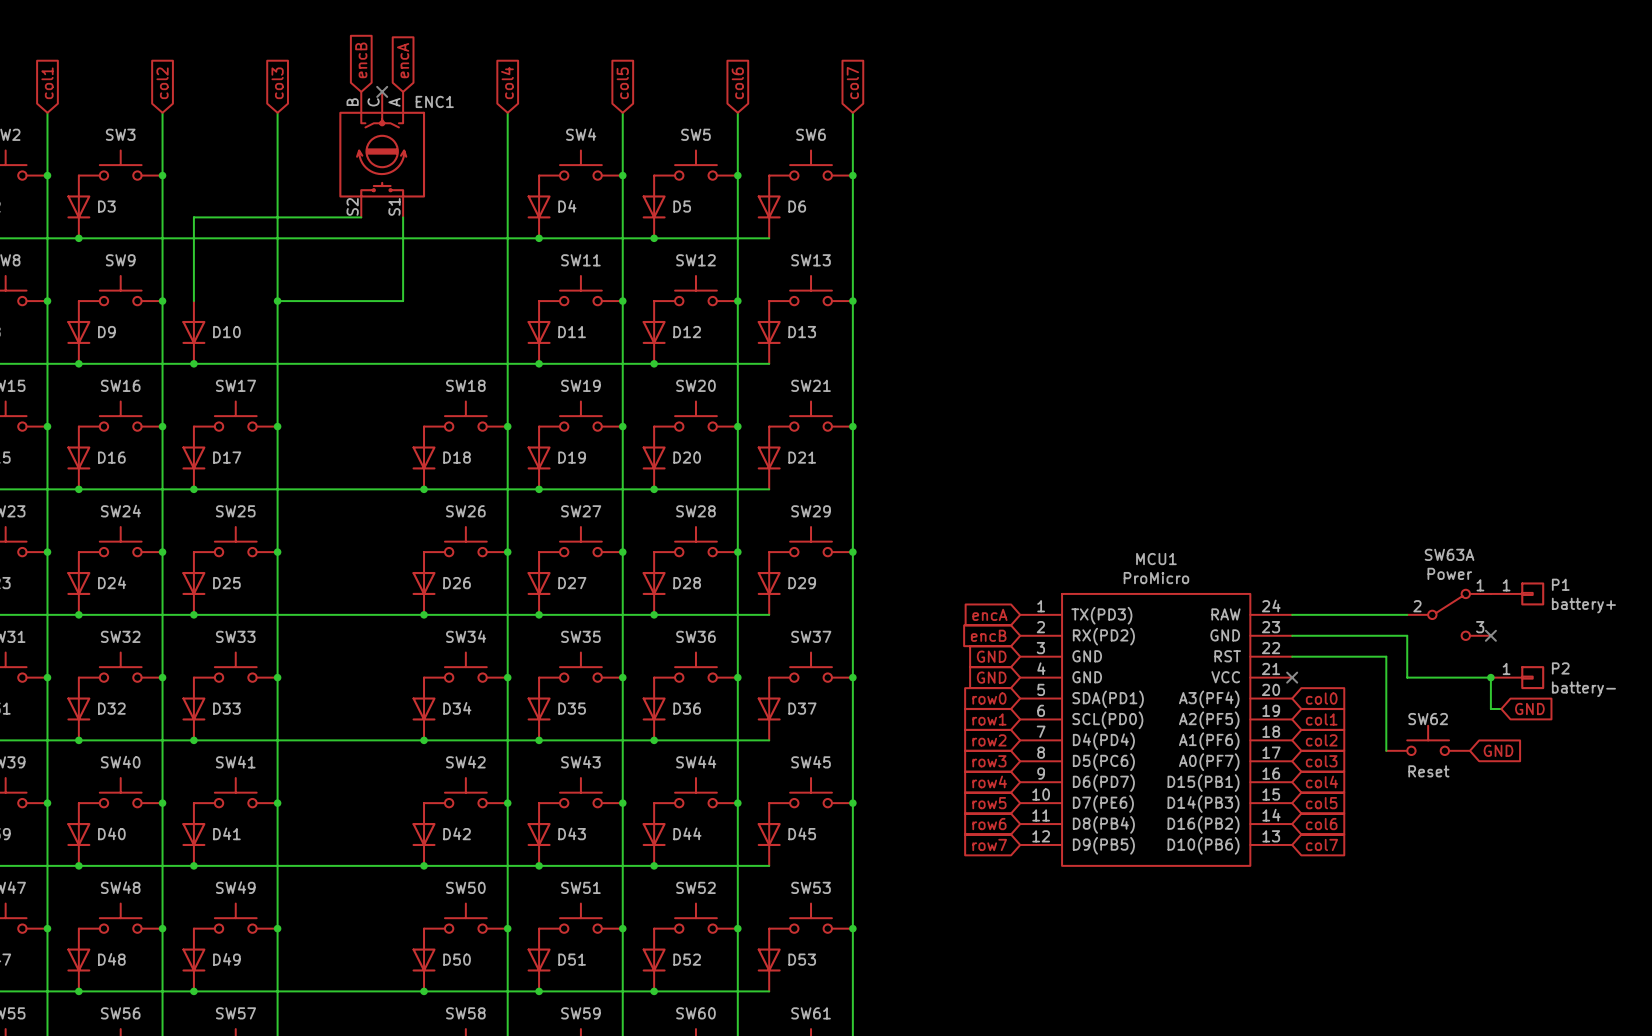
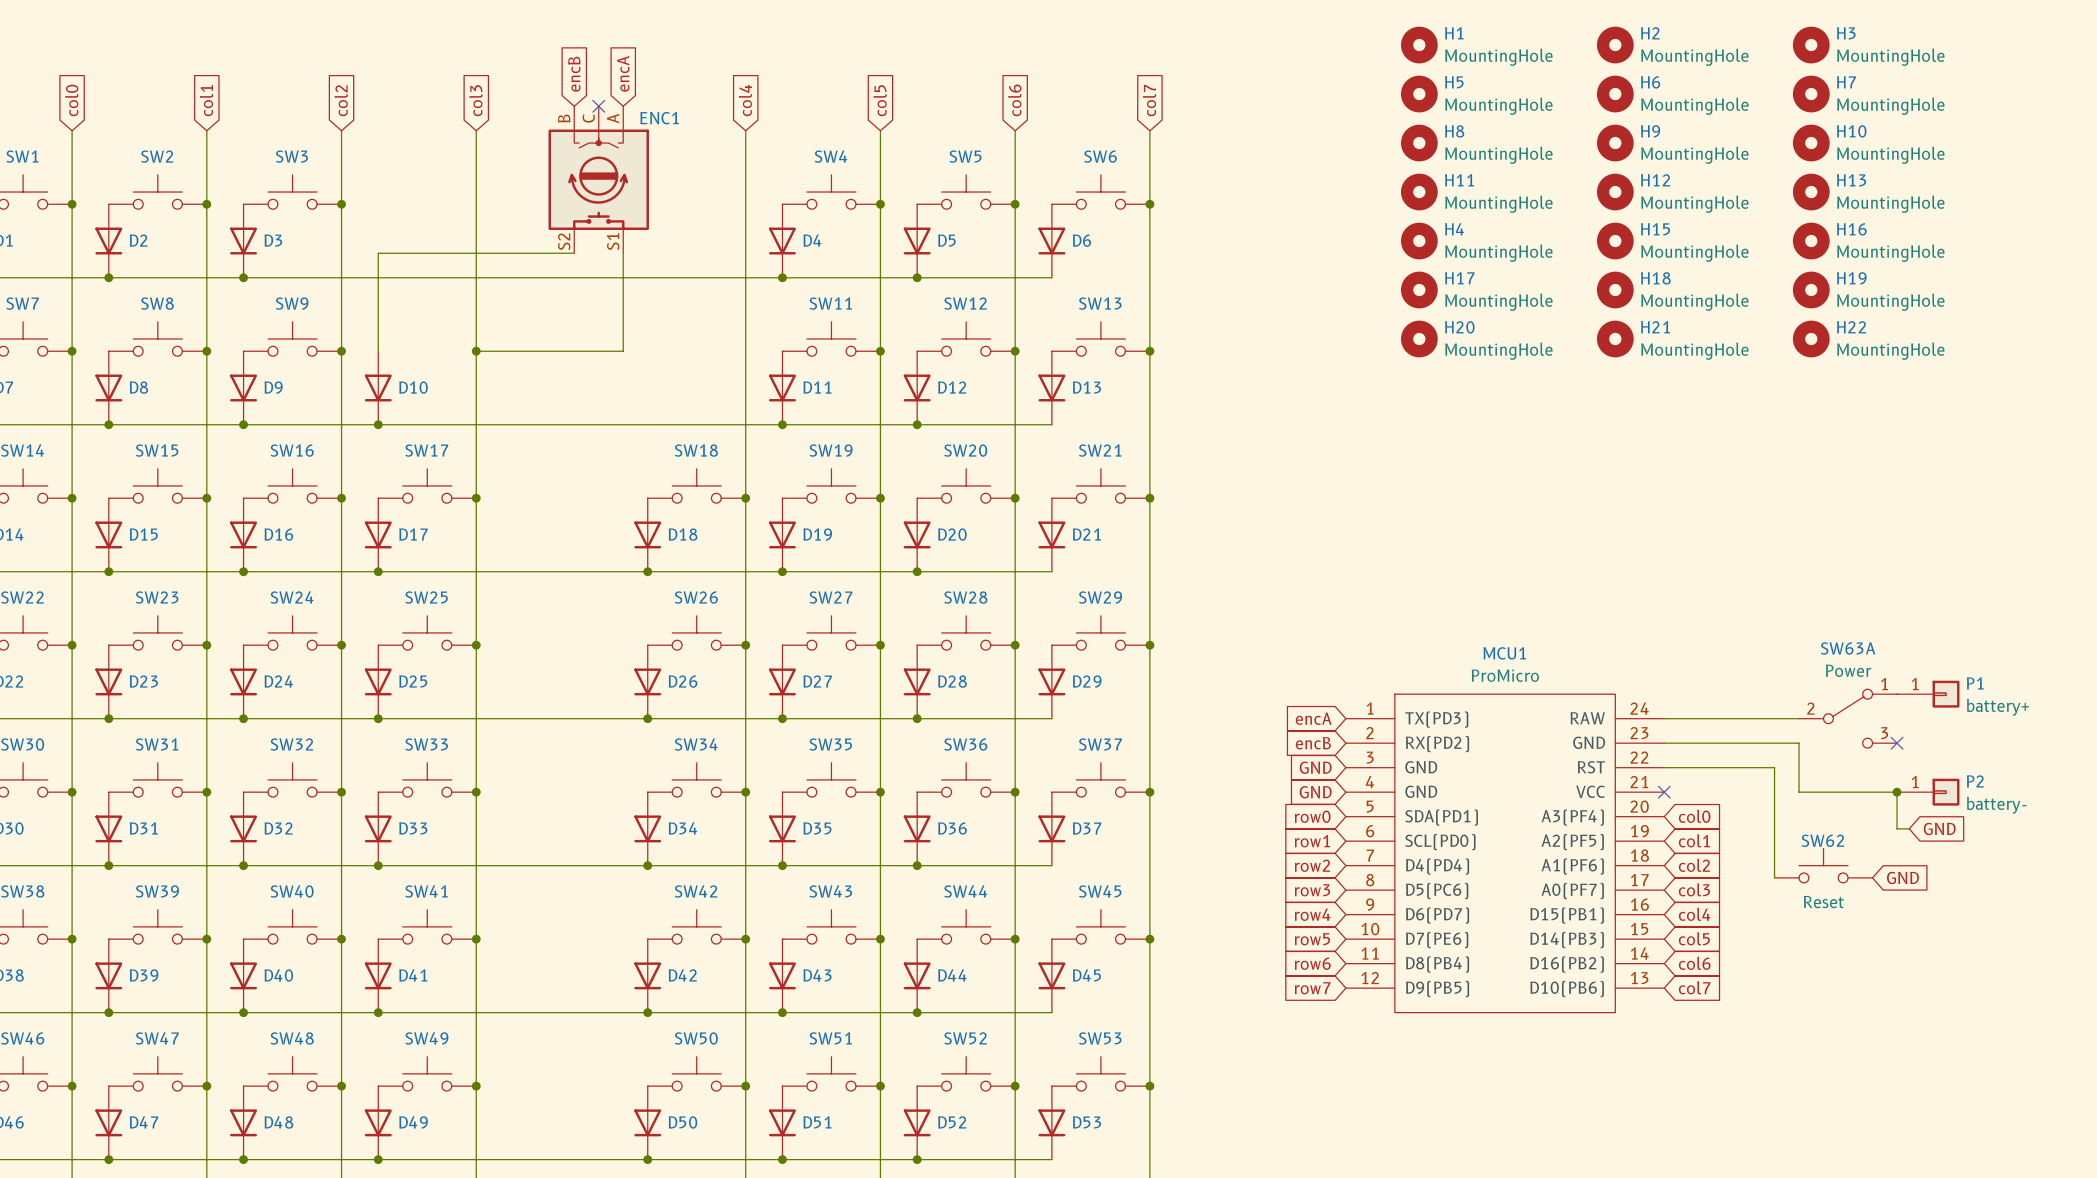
H1: none -> MountingHole (1419, 45)
H2: none -> MountingHole (1615, 45)
H3: none -> MountingHole (1811, 45)
H5: none -> MountingHole (1419, 94)
H6: none -> MountingHole (1615, 94)
H7: none -> MountingHole (1811, 94)
H8: none -> MountingHole (1419, 143)
H9: none -> MountingHole (1615, 143)
H10: none -> MountingHole (1811, 143)
H11: none -> MountingHole (1419, 192)
H12: none -> MountingHole (1615, 192)
H13: none -> MountingHole (1811, 192)
H4: none -> MountingHole (1419, 241)
H15: none -> MountingHole (1615, 241)
H16: none -> MountingHole (1811, 241)
H17: none -> MountingHole (1419, 290)
H18: none -> MountingHole (1615, 290)
H19: none -> MountingHole (1811, 290)
H20: none -> MountingHole (1419, 339)
H21: none -> MountingHole (1615, 339)
H22: none -> MountingHole (1811, 339)

